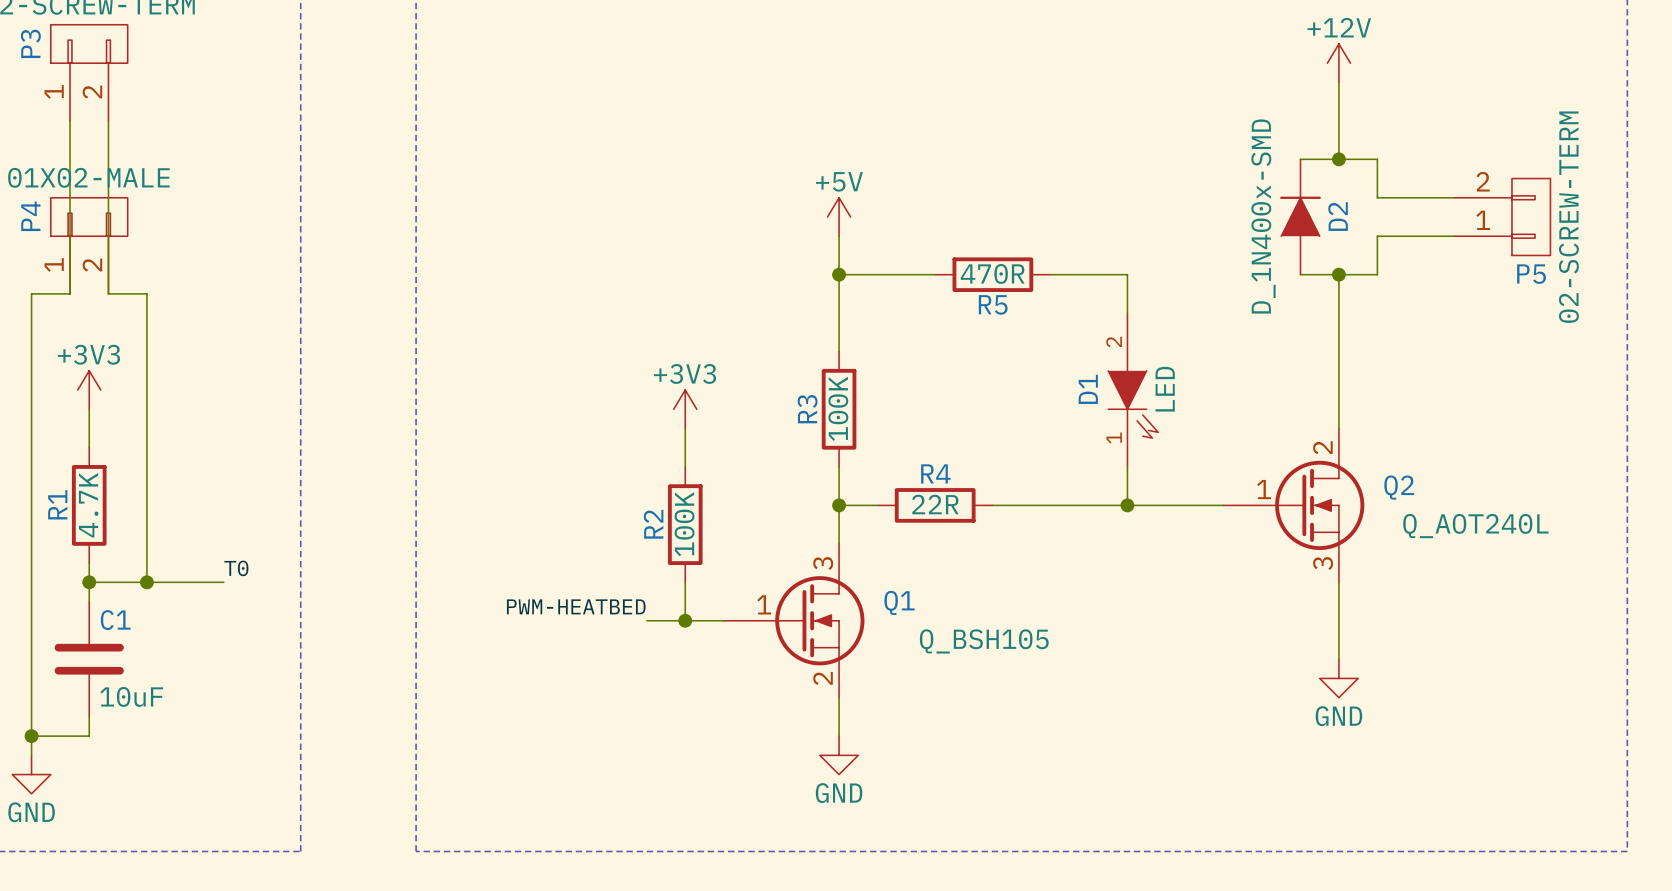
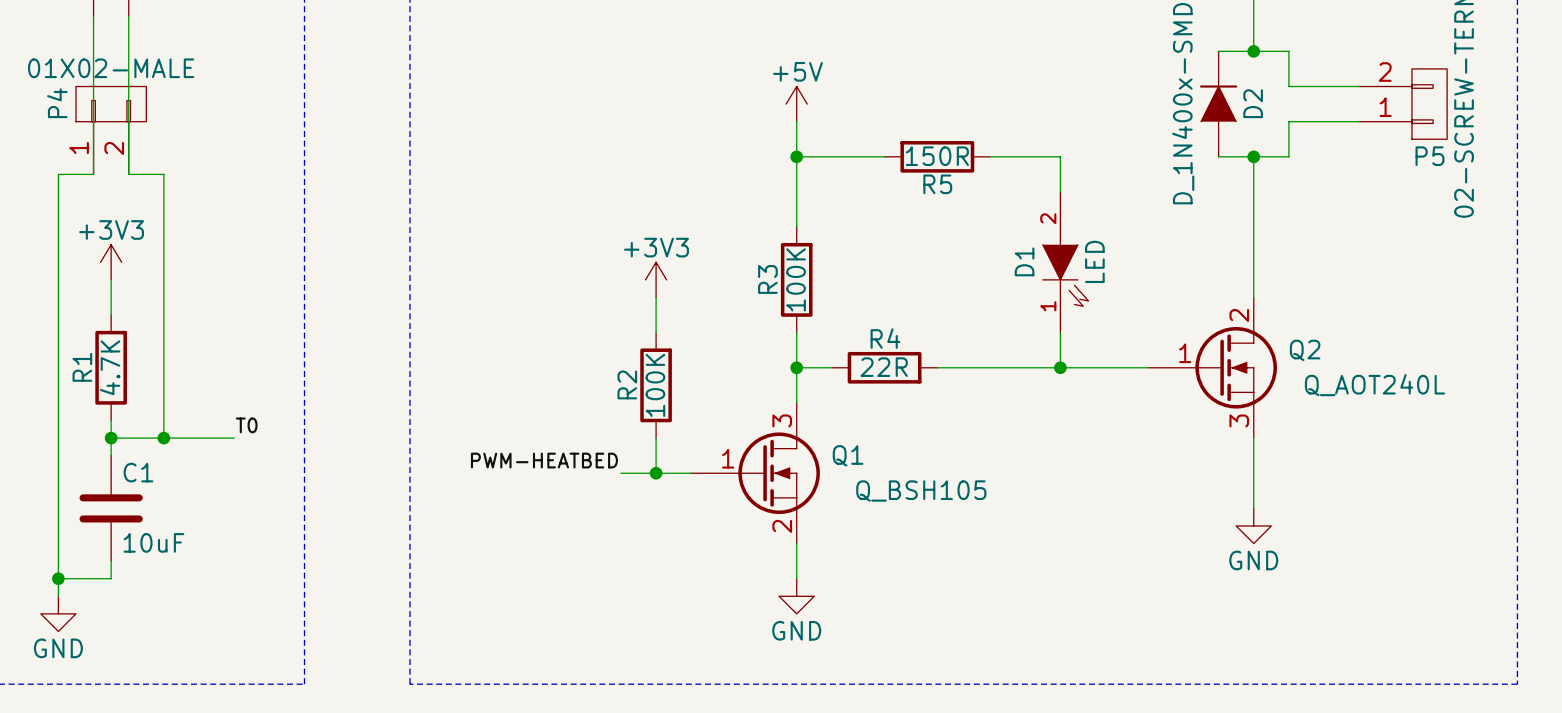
R5 value: 470R (992, 273) -> 150R (937, 156)

